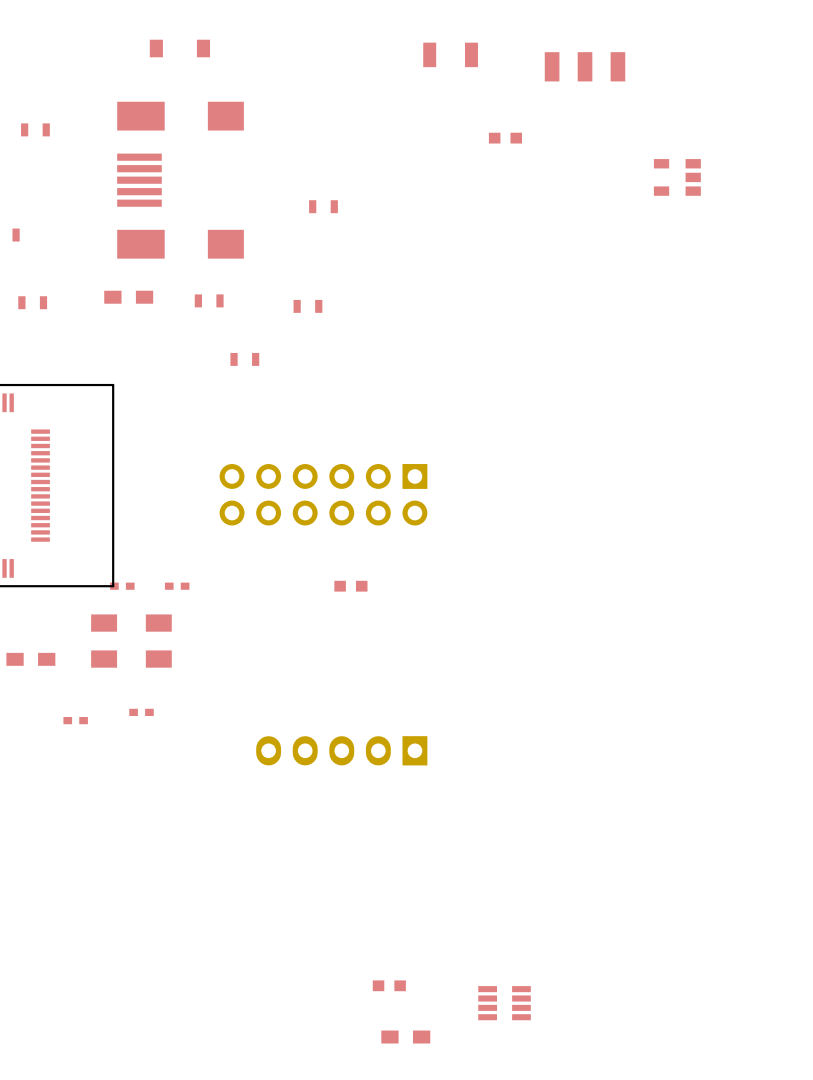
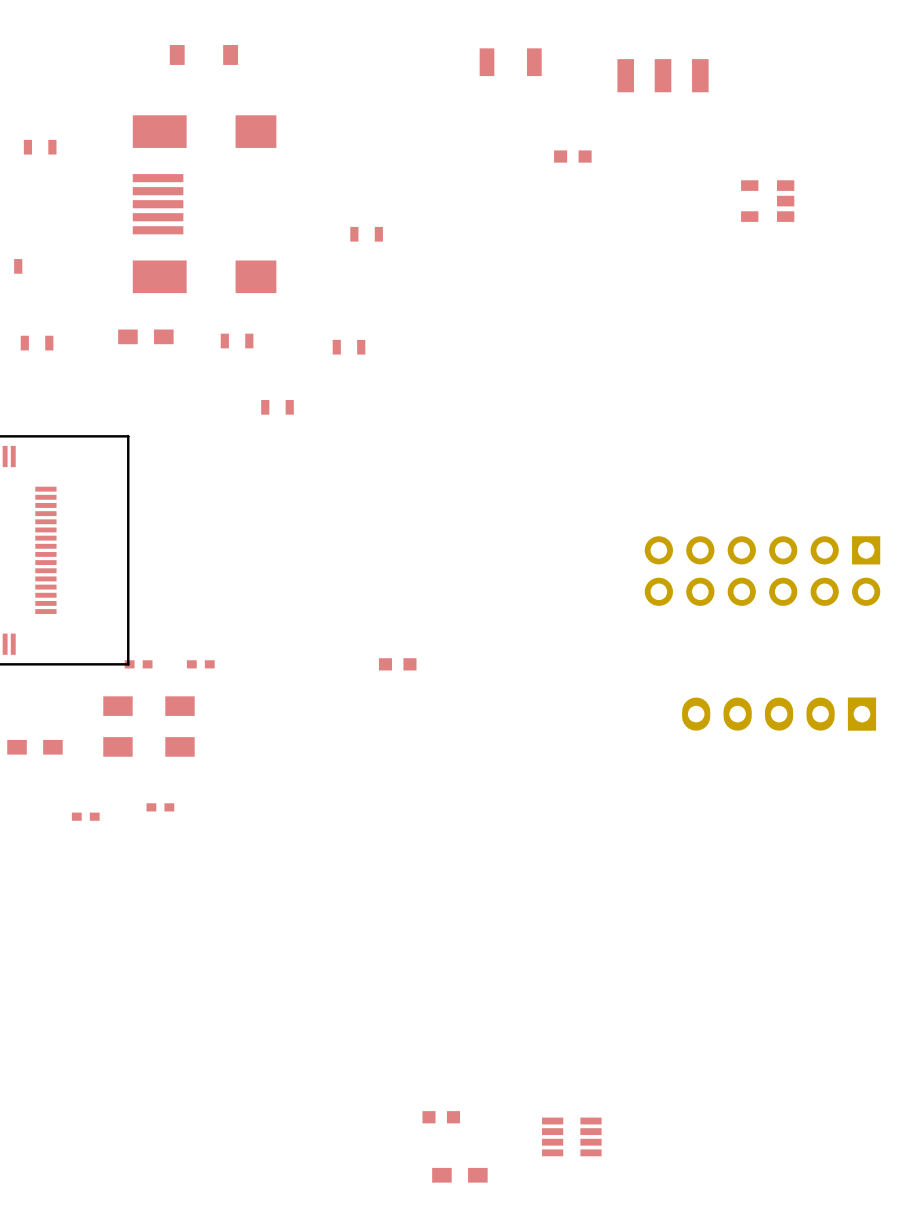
part position: (323, 494) -> (762, 571)
part: none -> (779, 714)
part: (341, 750) -> none

